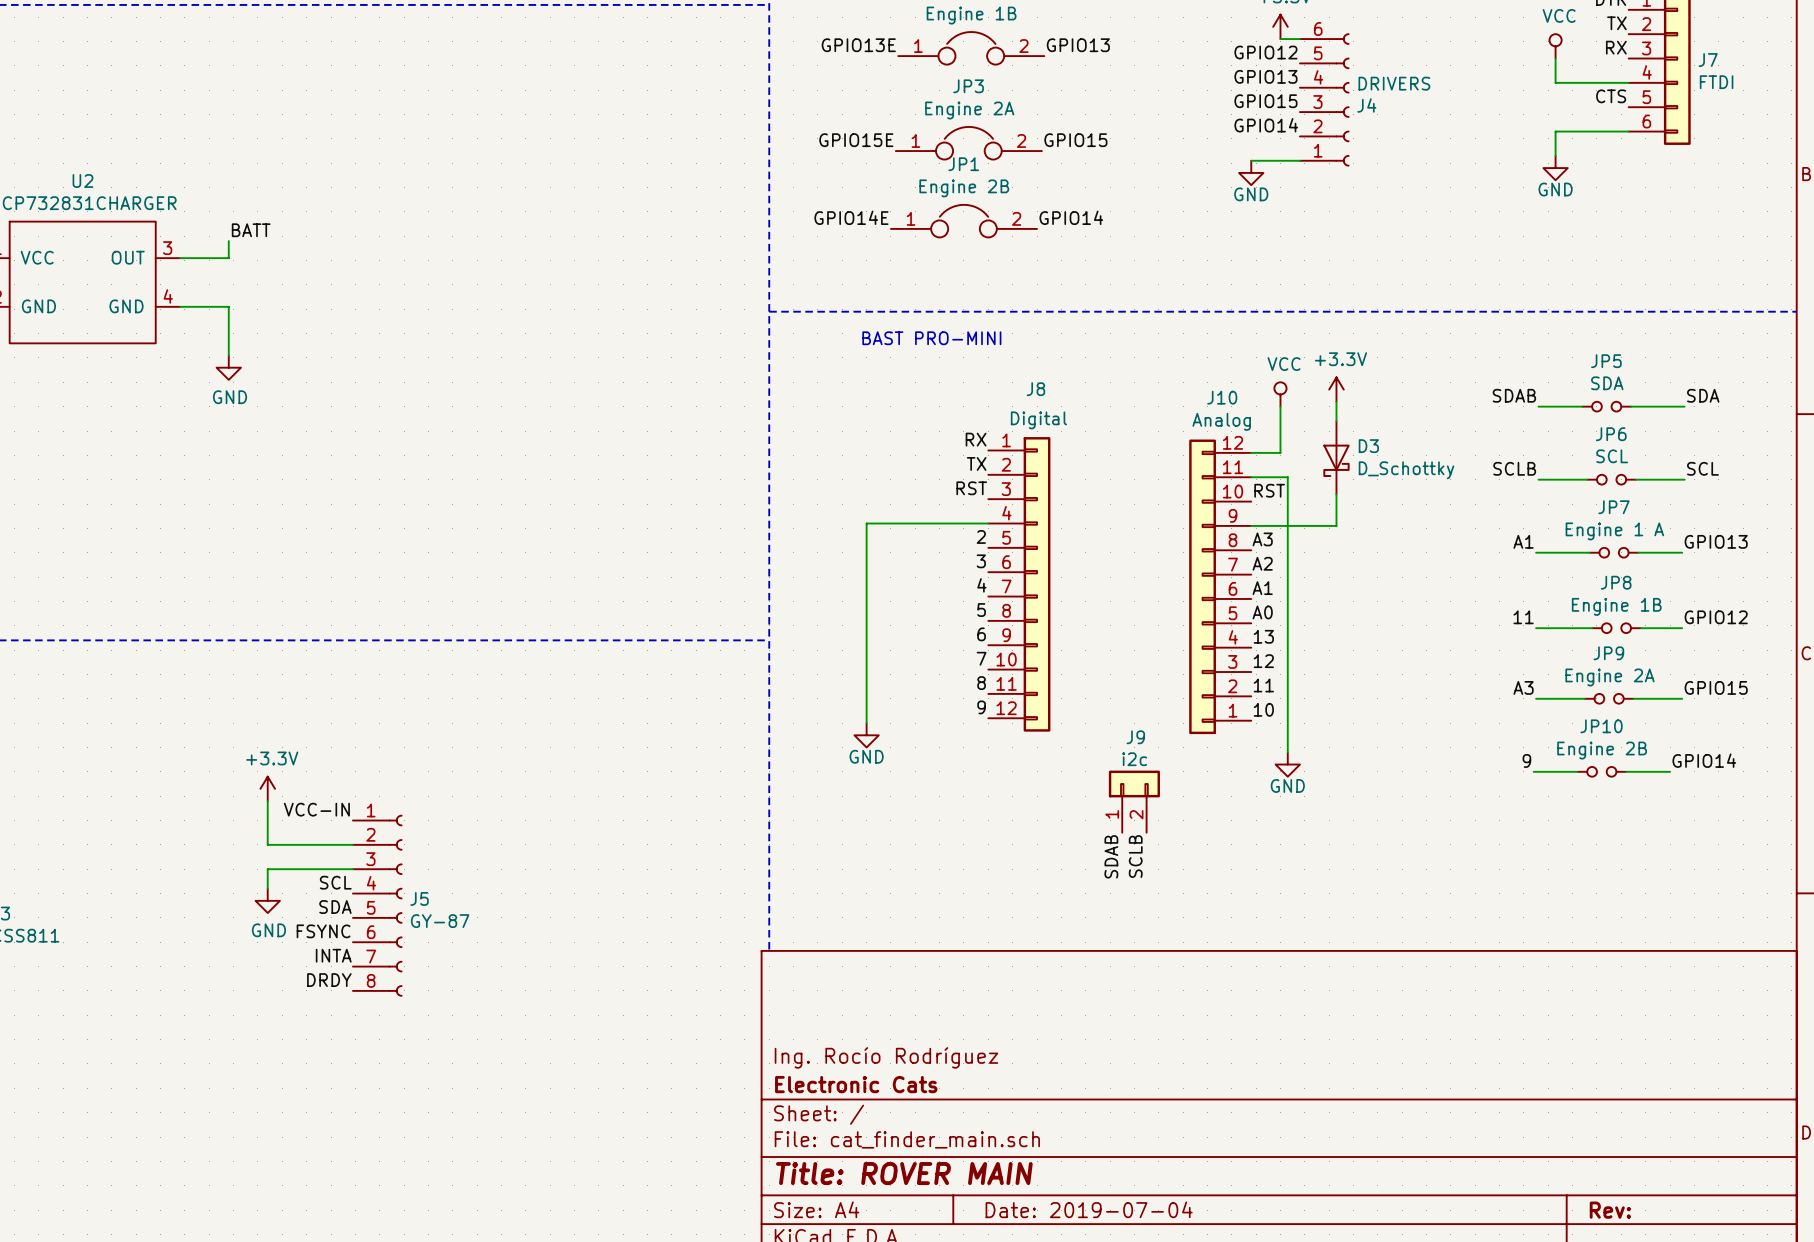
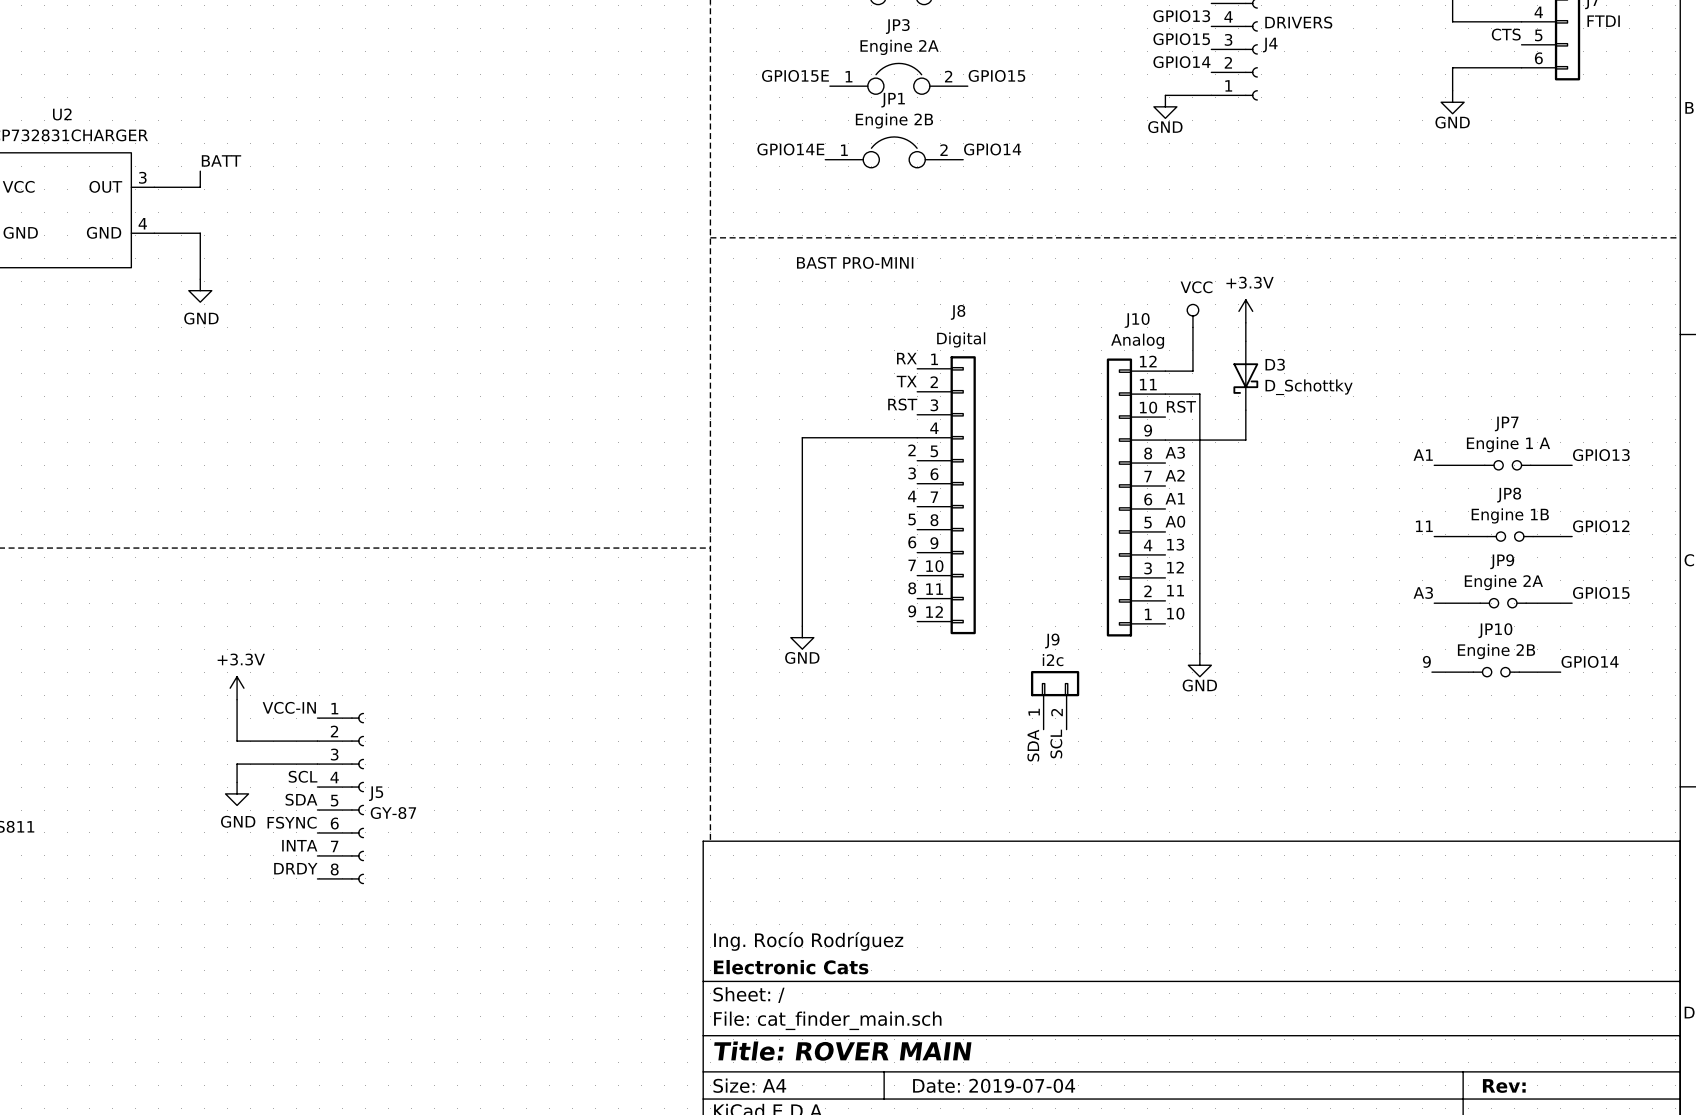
label: SDAB (1514, 395) -> none
label: SDA (1703, 395) -> none
wire: (1538, 406) (1582, 406) -> none
JP5: SDA (1606, 406) -> none
wire: (1631, 406) (1684, 406) -> none
label: SCLB (1514, 468) -> none
label: SCL (1702, 468) -> none
wire: (1538, 479) (1587, 479) -> none
JP6: SCL (1611, 479) -> none
wire: (1635, 479) (1684, 479) -> none
label: SDAB (1111, 856) -> SDA (1033, 745)
label: SCLB (1135, 856) -> SCL (1056, 744)

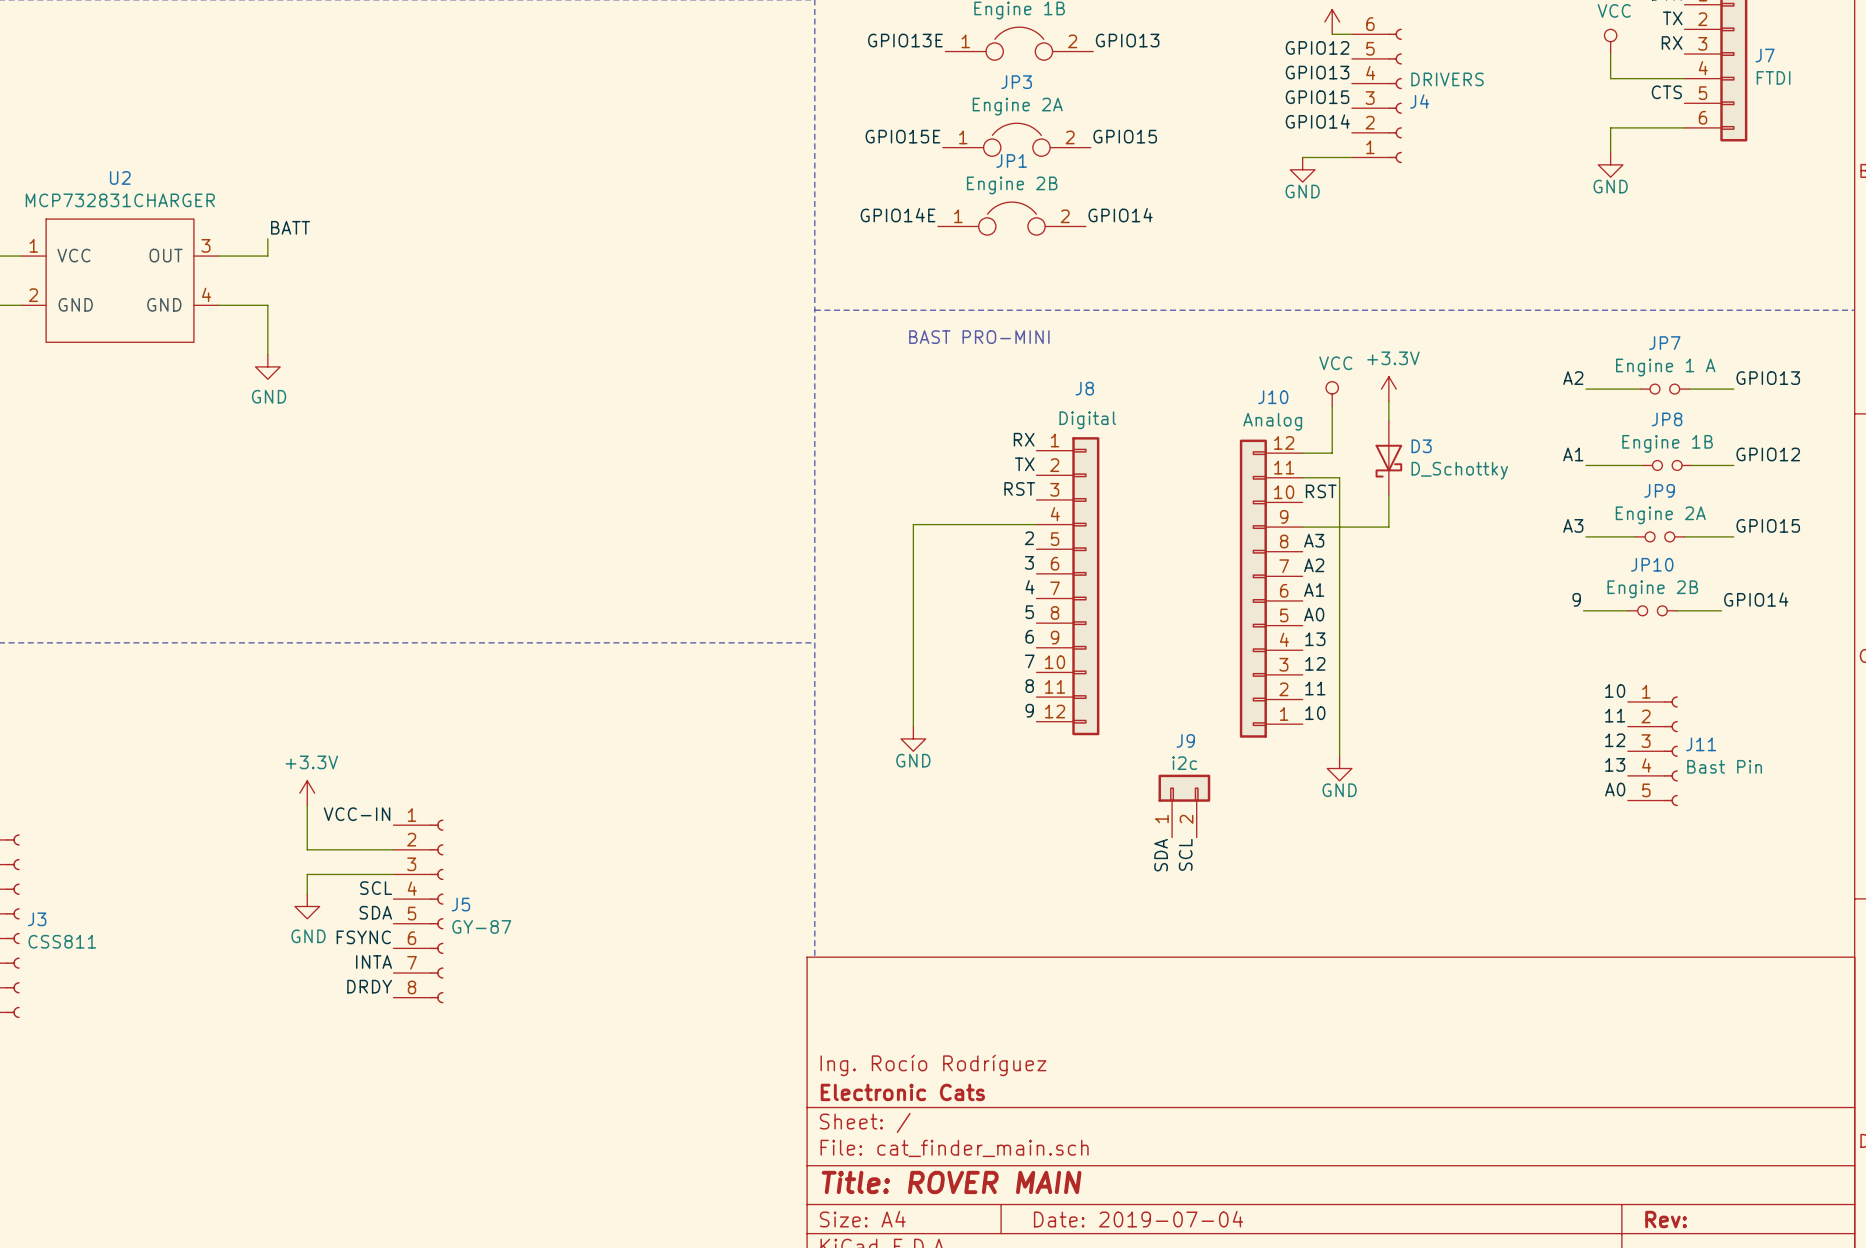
label: none -> A2 (1573, 378)
label position: A1 (1423, 455) -> A1 (1573, 454)
label position: GPIO13 (1601, 455) -> GPIO13 (1768, 378)
wire: (1434, 465) (1484, 465) -> (1585, 389) (1640, 389)
JP7 position: (1507, 465) -> (1664, 389)
wire: (1530, 465) (1572, 465) -> (1689, 389) (1733, 389)
label position: 11 (1424, 526) -> 11 (1615, 715)
label position: GPIO12 (1601, 526) -> GPIO12 (1768, 454)
wire: (1434, 536) (1487, 536) -> (1585, 465) (1642, 465)
JP8 position: (1510, 536) -> (1667, 465)
wire: (1533, 536) (1572, 536) -> (1691, 465) (1733, 465)
label position: A3 (1423, 592) -> A3 (1573, 525)
label: none -> 10 (1615, 690)
label position: GPIO15 (1601, 592) -> GPIO15 (1768, 525)
wire: (1434, 603) (1480, 603) -> (1585, 536) (1635, 536)
JP9 position: (1503, 603) -> (1659, 536)
wire: (1526, 603) (1572, 603) -> (1684, 536) (1733, 536)
label: none -> 12 (1615, 740)
J11: none -> Bast Pin (1652, 751)
label position: 9 (1426, 661) -> 9 (1576, 599)
label: none -> 13 (1615, 764)
label position: GPIO14 (1590, 661) -> GPIO14 (1756, 599)
wire: (1431, 672) (1473, 672) -> (1583, 610) (1627, 610)
JP10 position: (1496, 672) -> (1652, 610)
wire: (1519, 672) (1560, 672) -> (1677, 610) (1721, 610)
label: none -> A0 (1615, 789)

